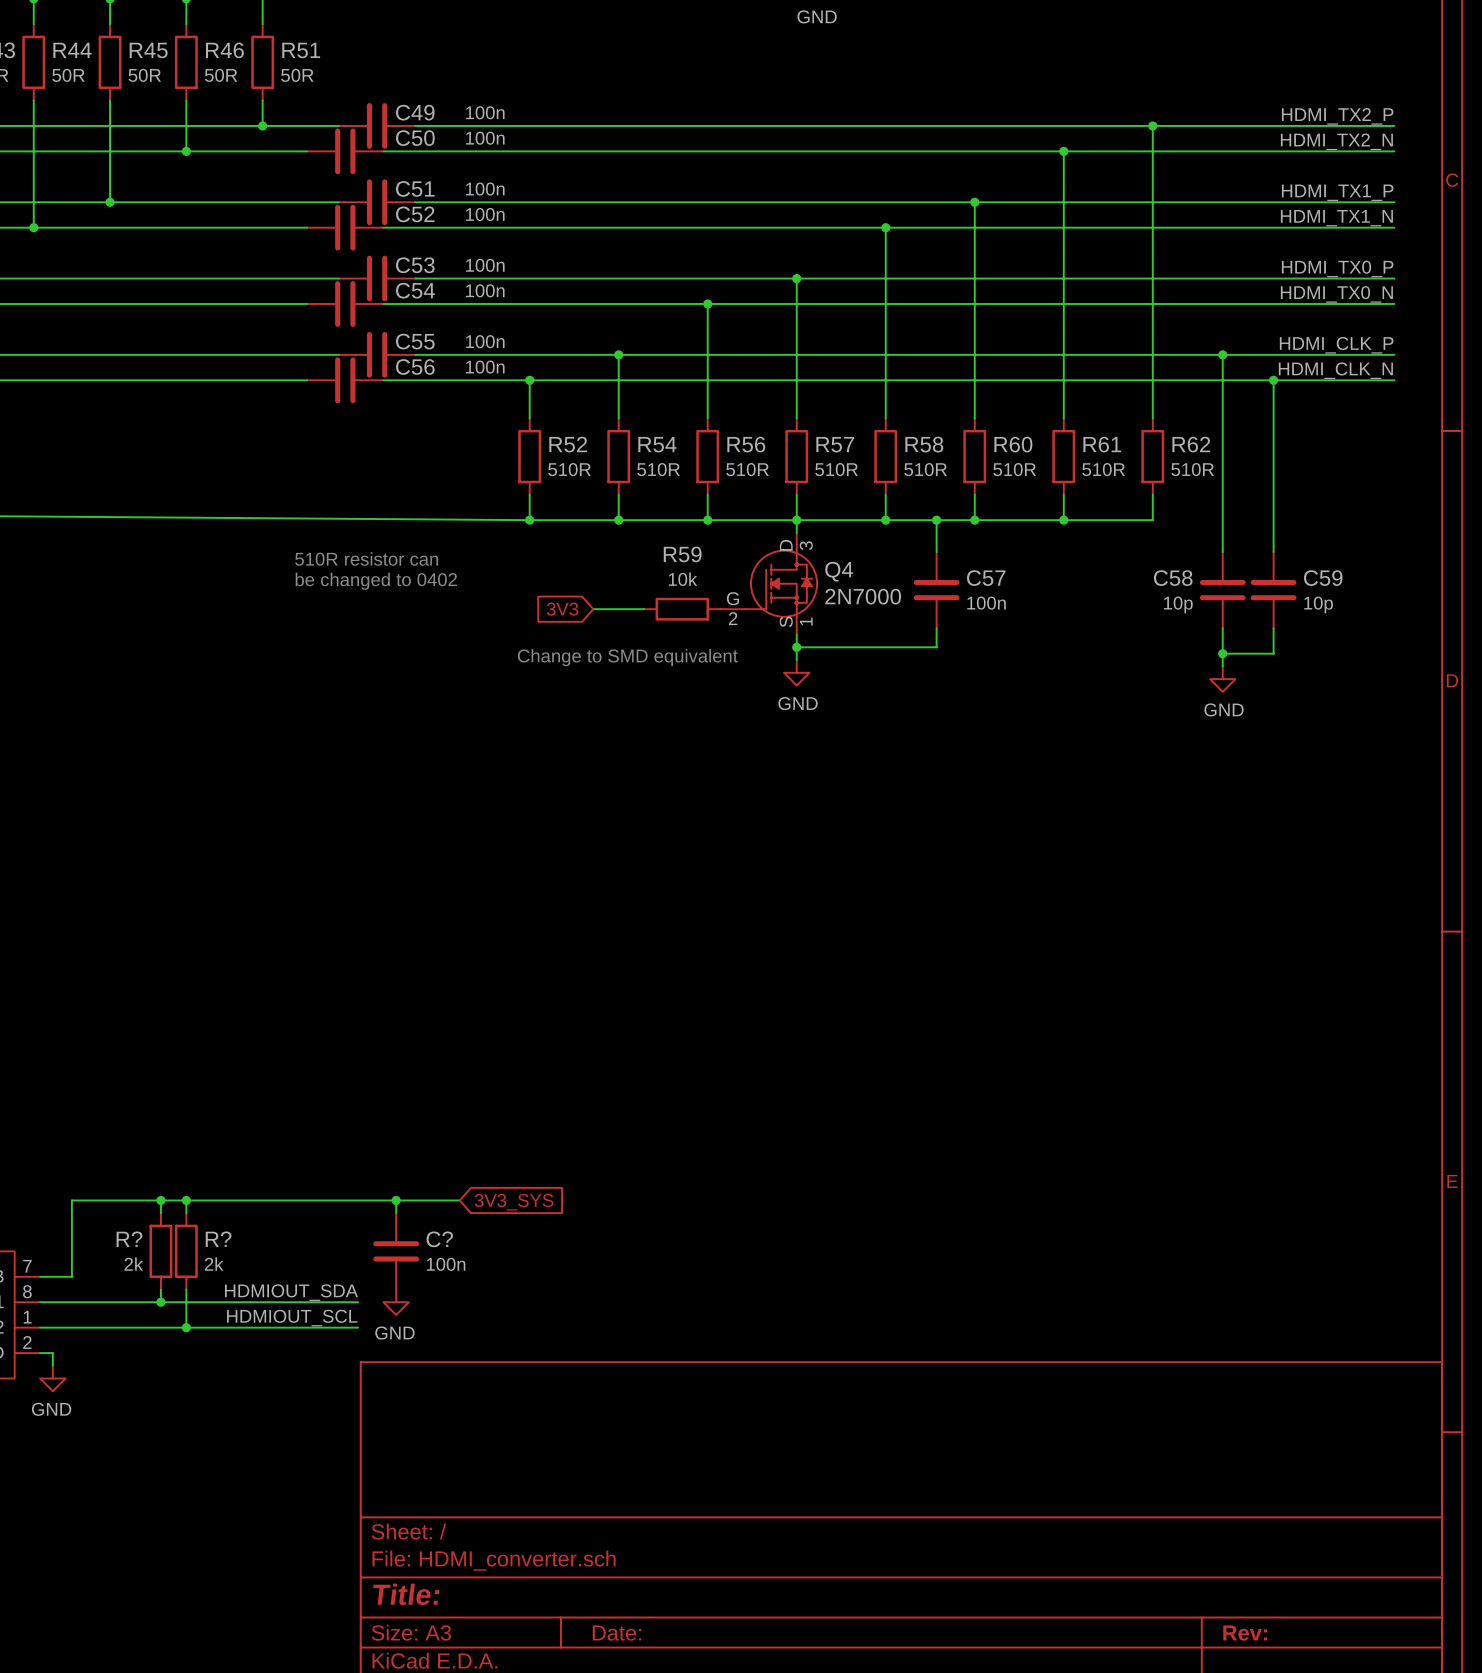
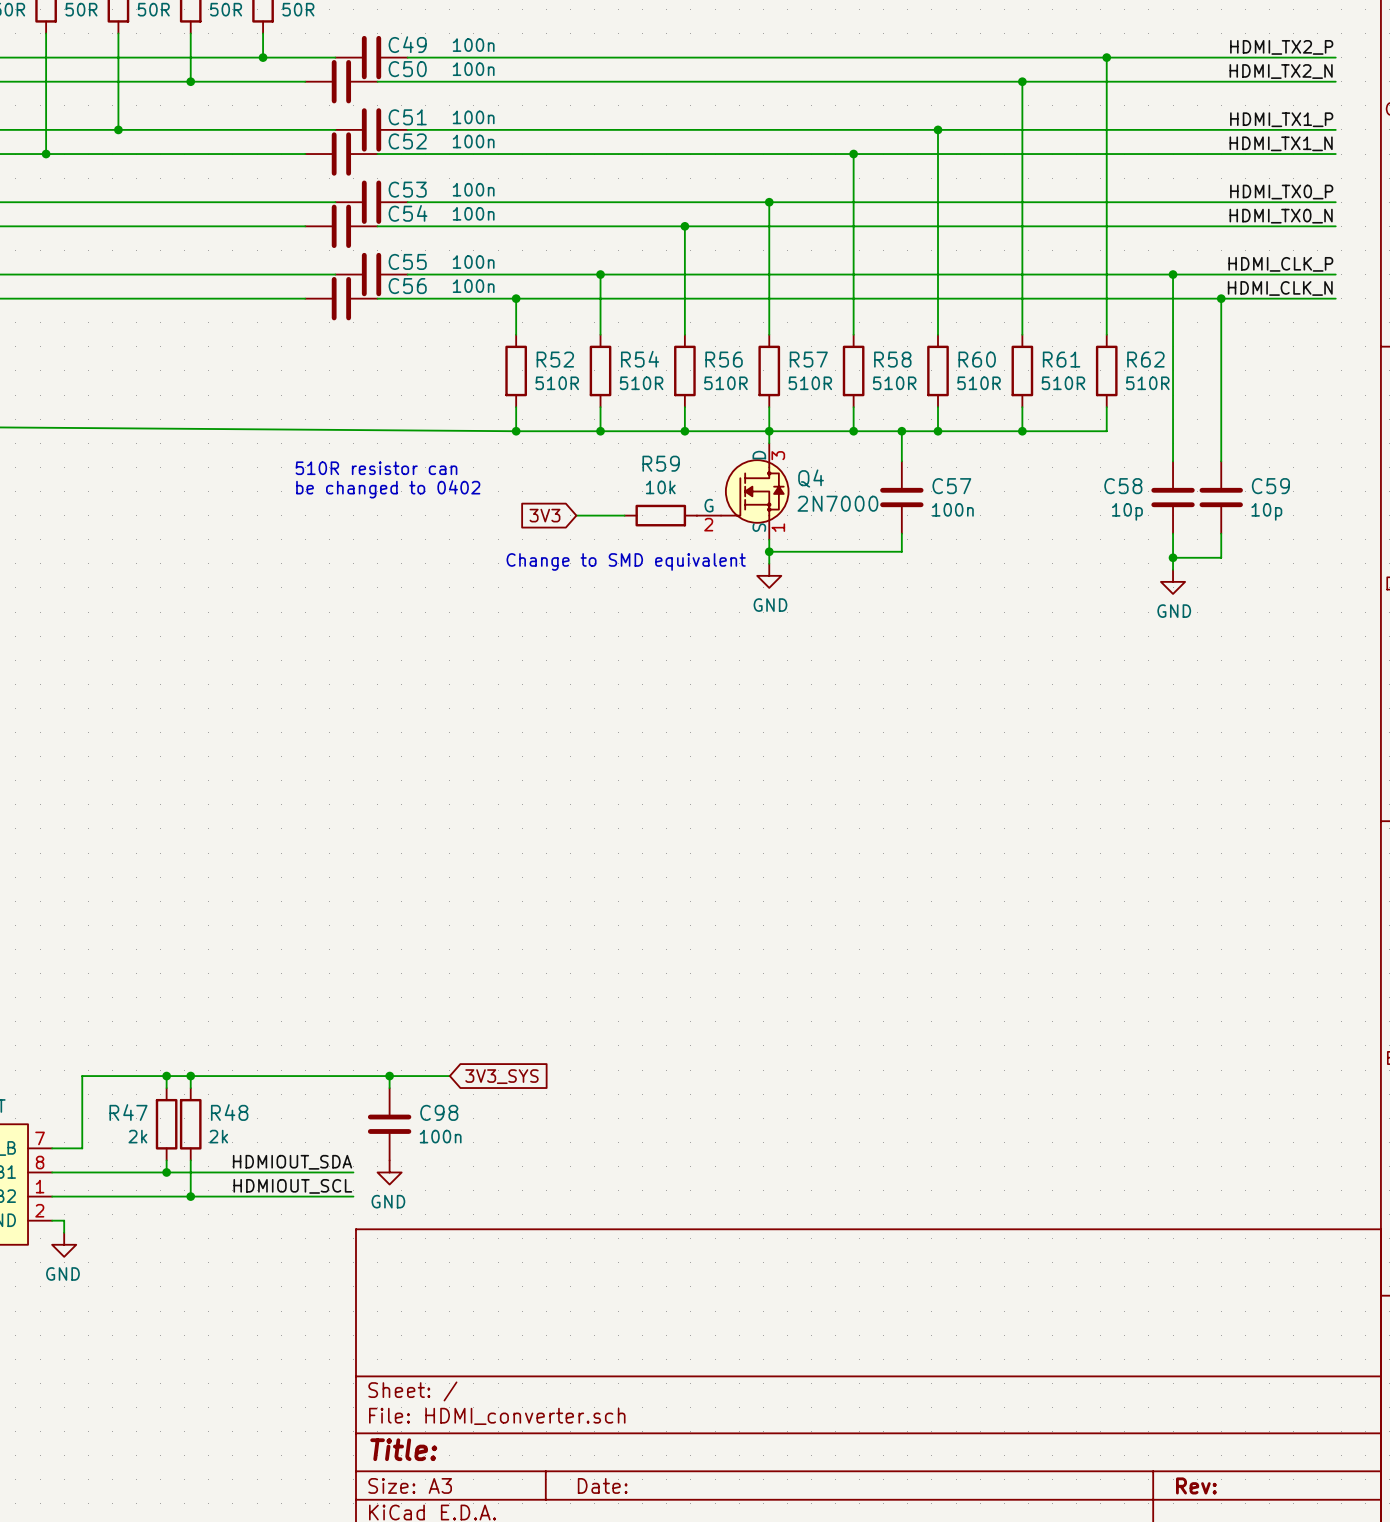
R? name: R? (129, 1239) -> R47 (128, 1112)
R? name: R? (218, 1239) -> R48 (229, 1112)
C? name: C? (439, 1239) -> C98 (439, 1112)

